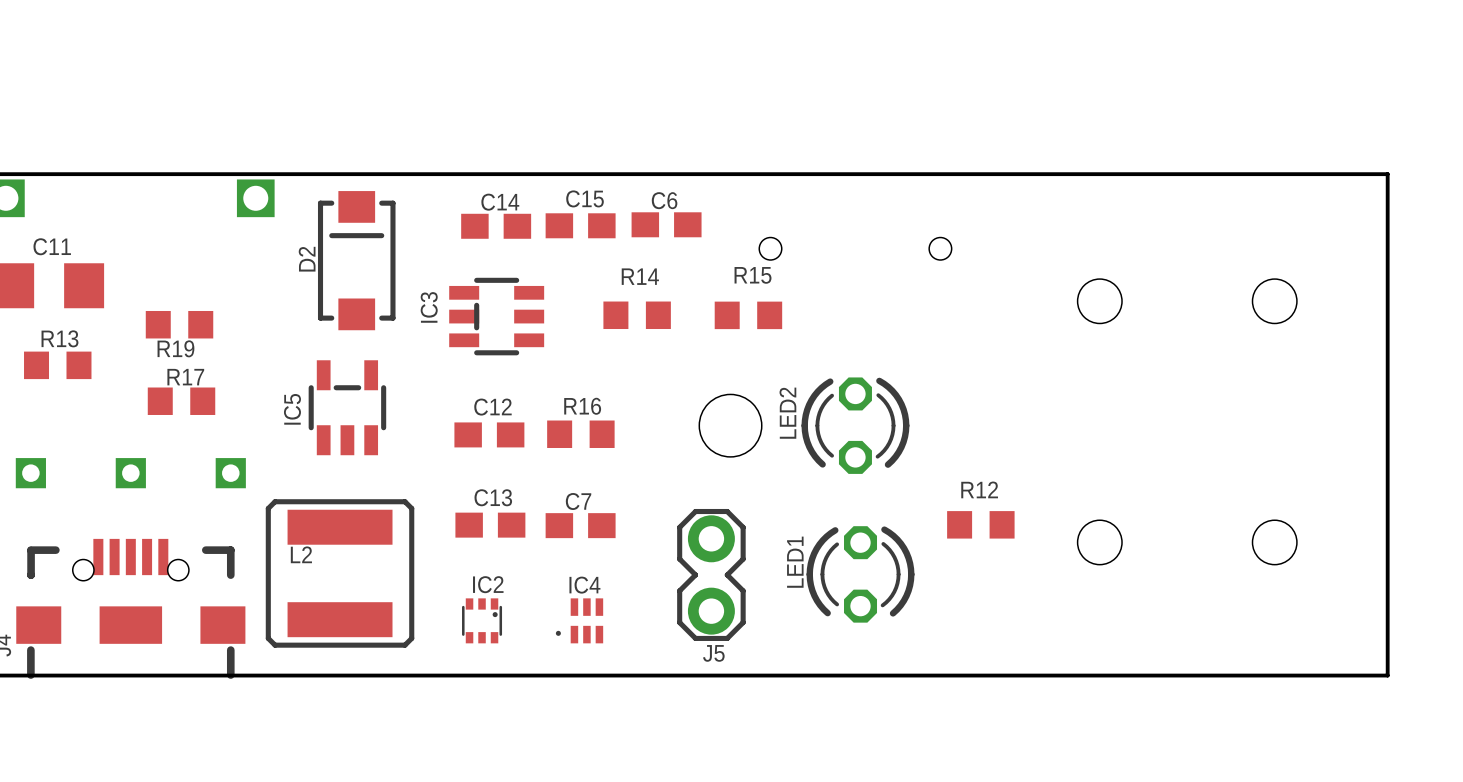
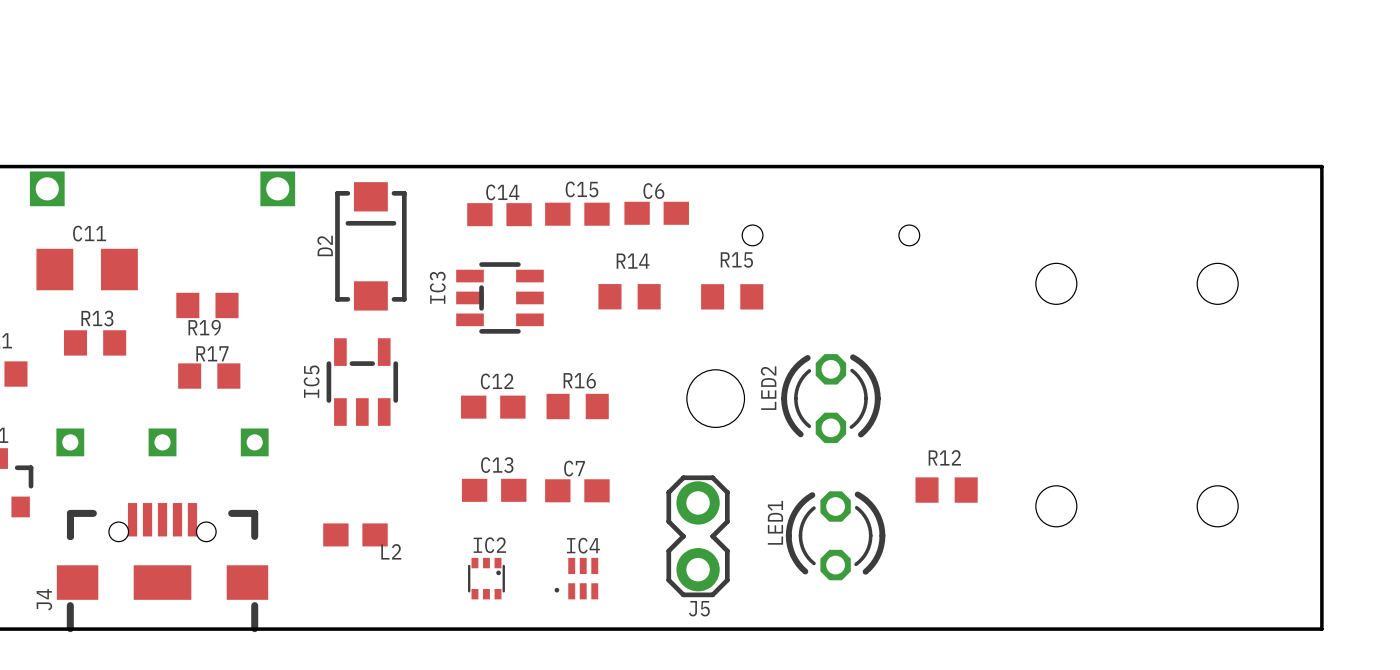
L2 footprint: [265, 499, 415, 648] -> [323, 523, 388, 547]
L2 name position: L2 (301, 554) -> L2 (391, 551)

